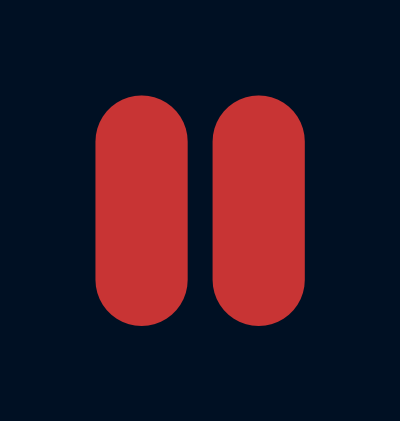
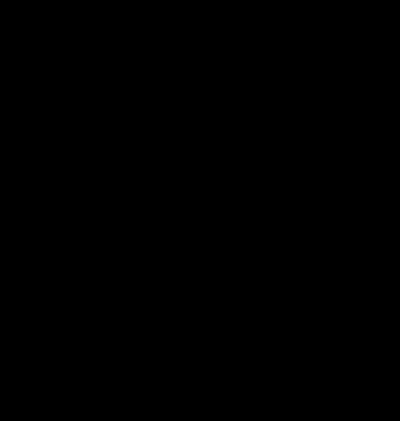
part: (200, 210) -> none

